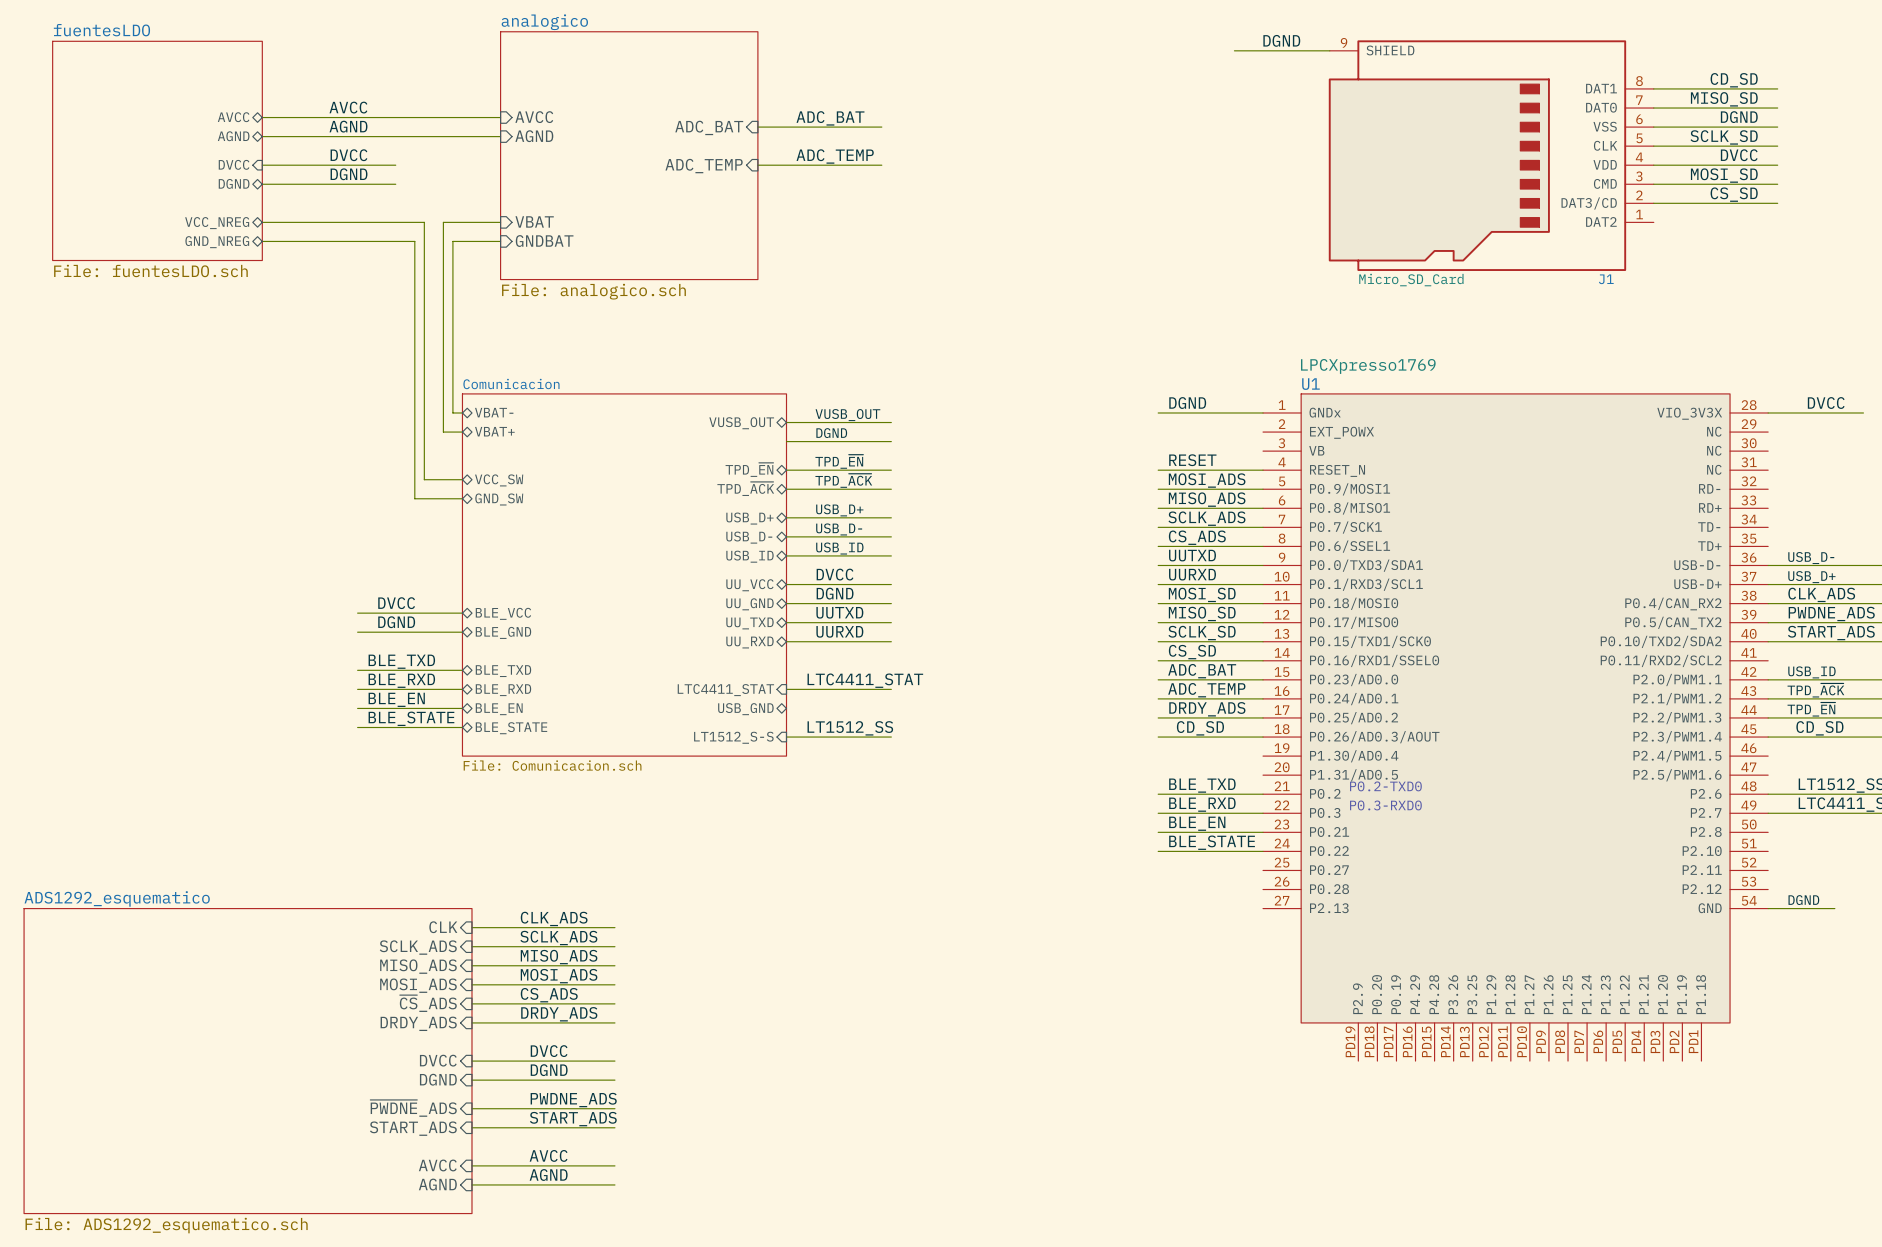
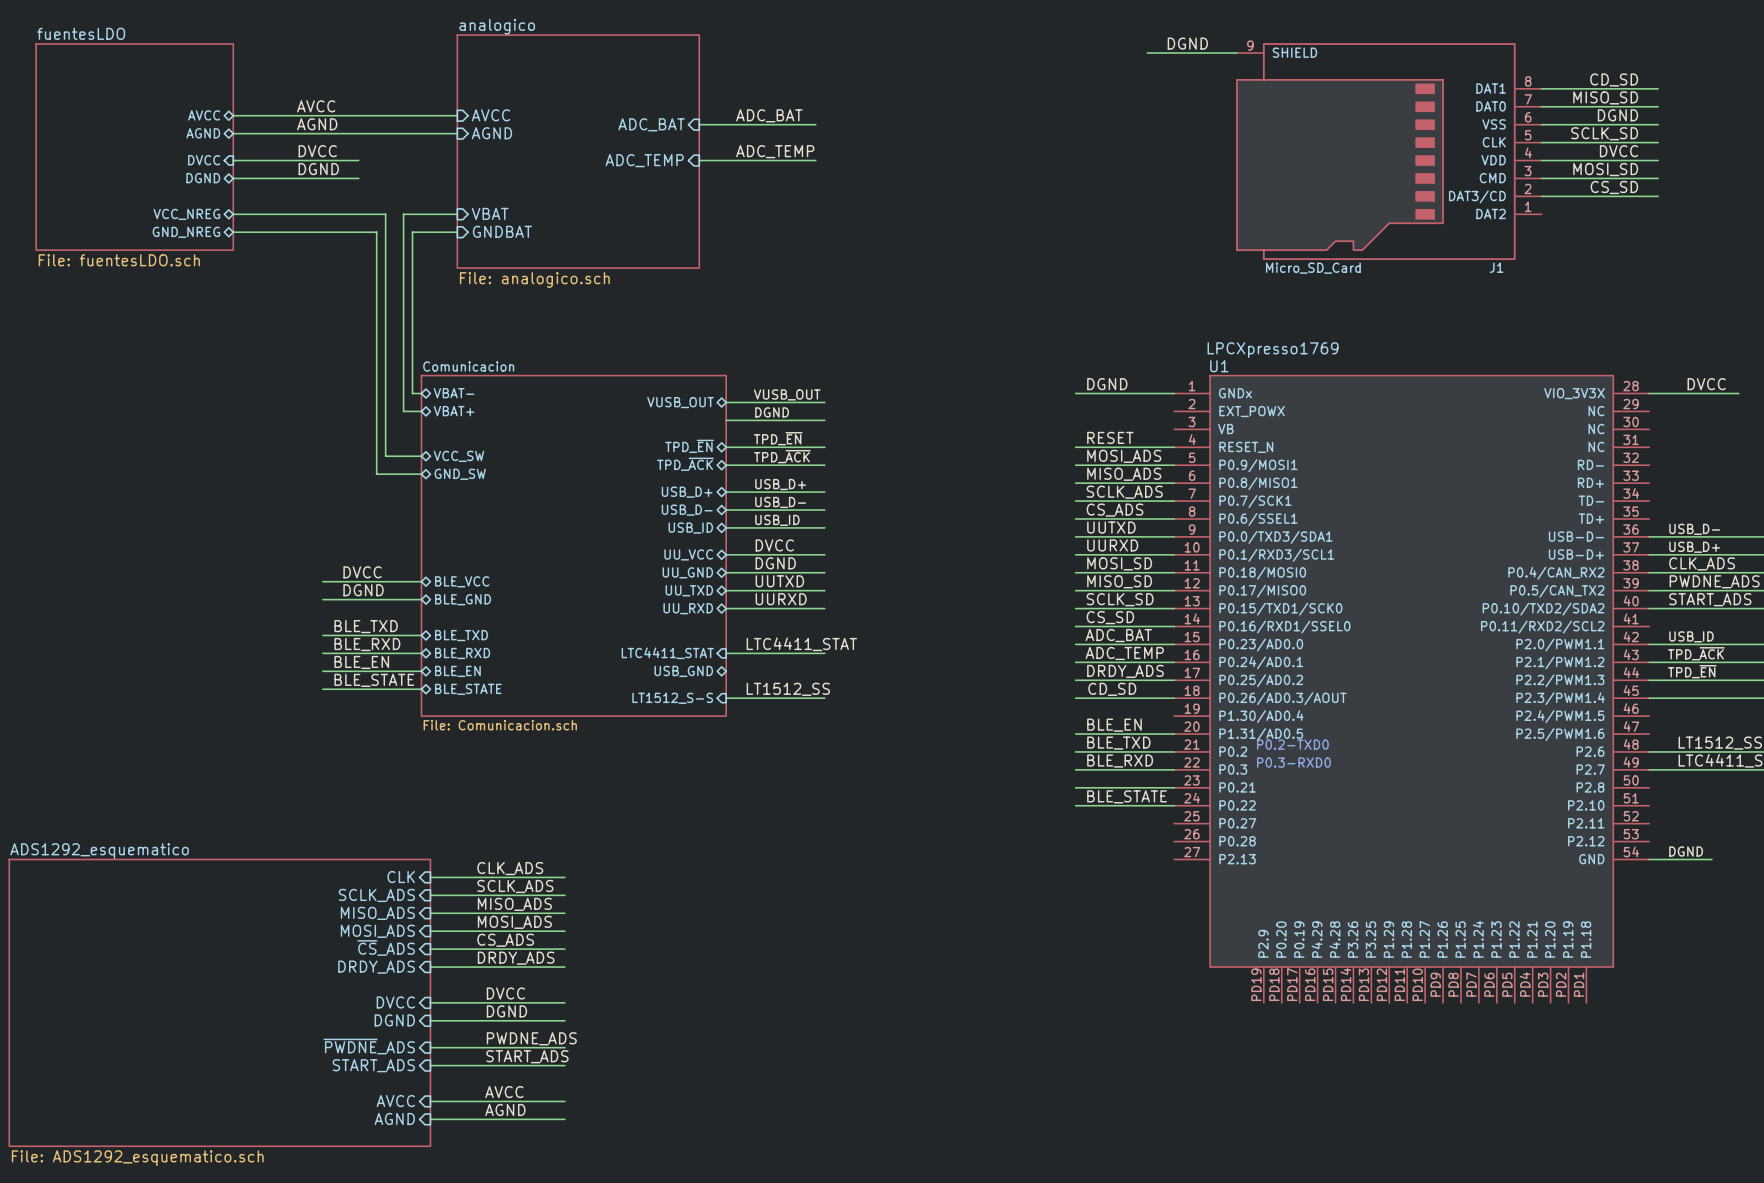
label: CD_SD (1819, 728) -> none
wire: none -> (1075, 734) (1174, 734)
label position: BLE_EN (1197, 823) -> BLE_EN (1114, 725)

